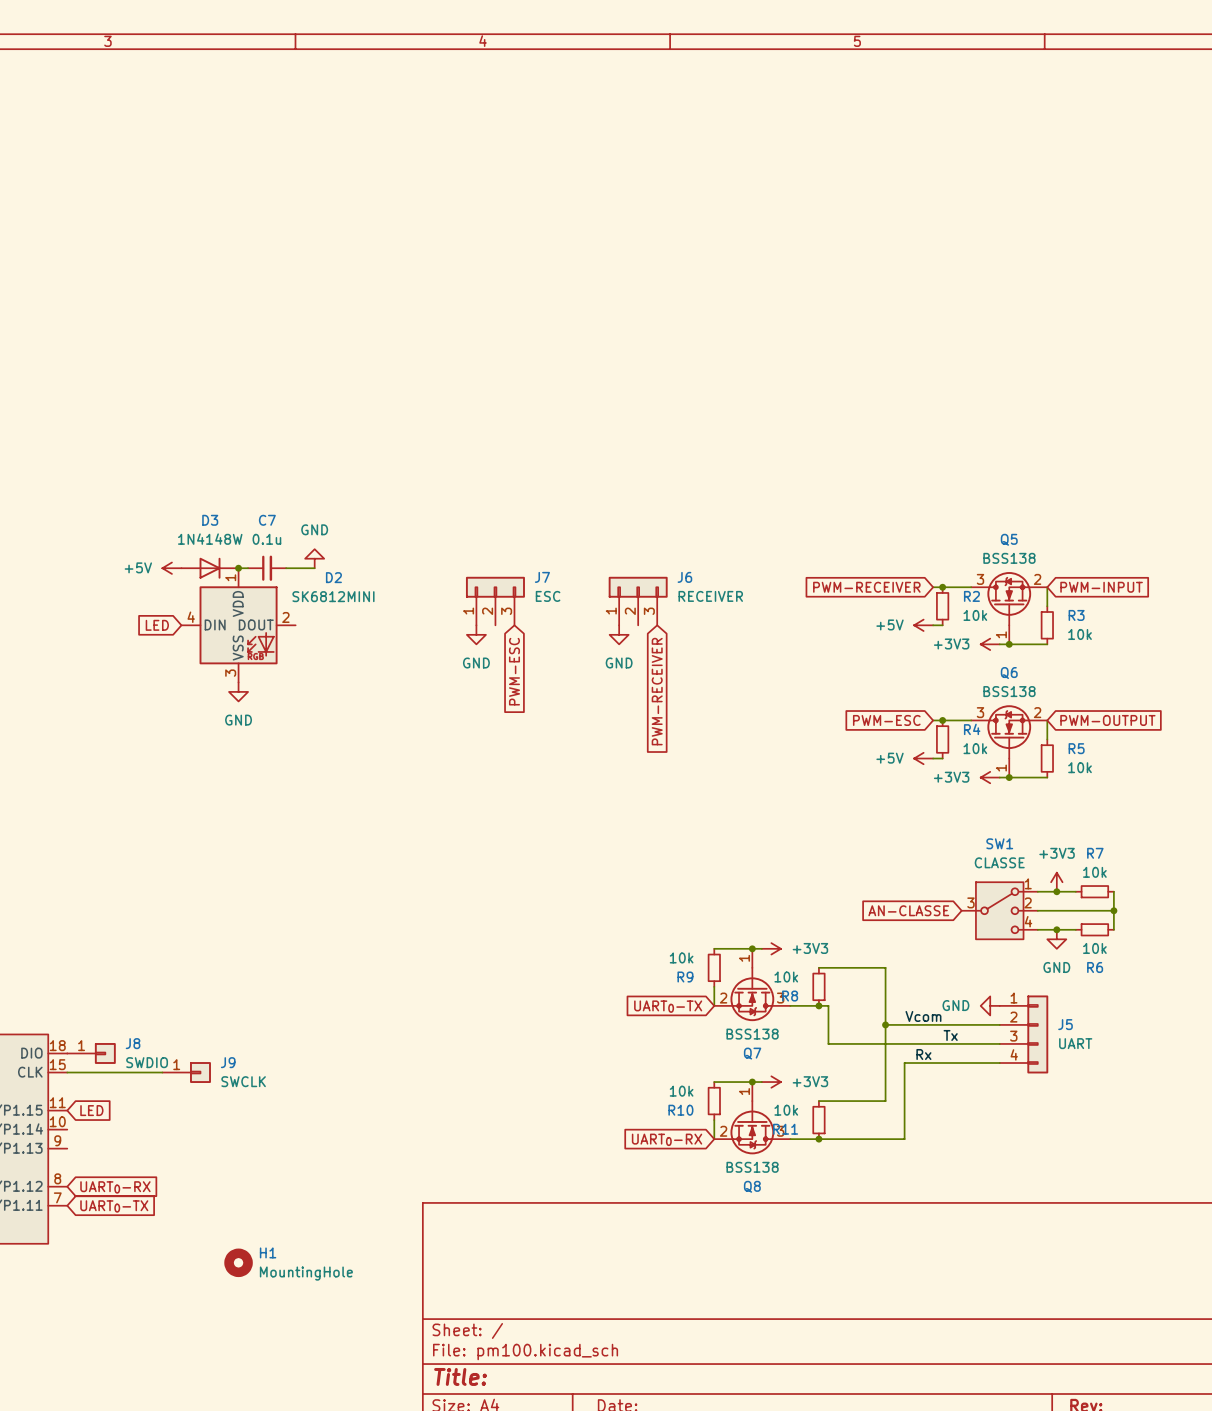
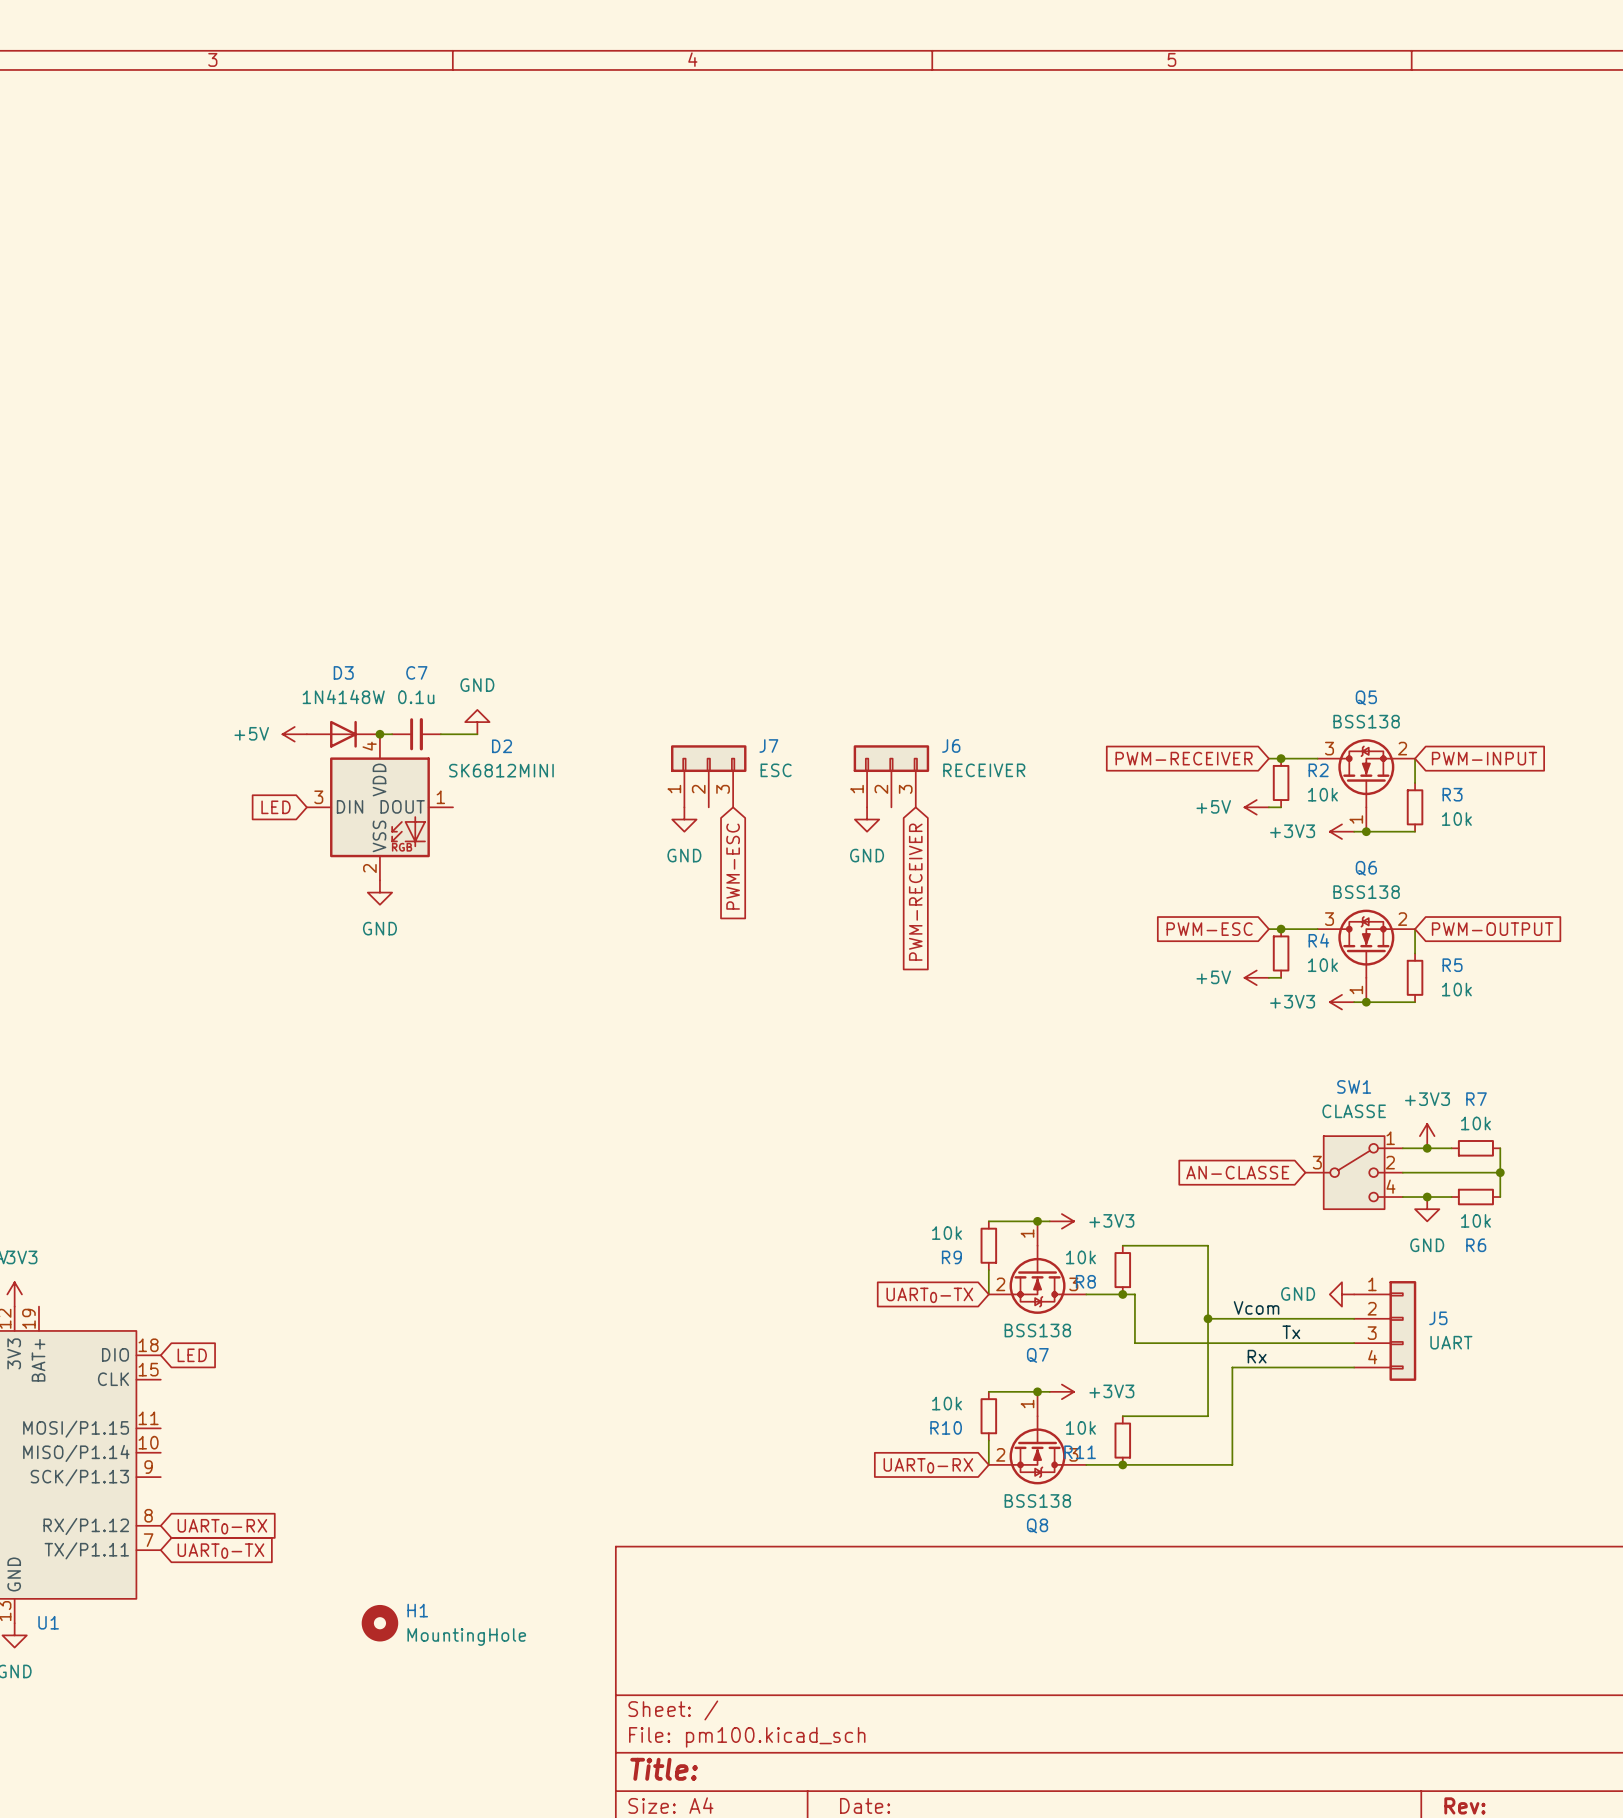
D2 pin number: 1 (230, 577) -> 4 (369, 746)
D2 pin number: 4 (191, 617) -> 3 (318, 797)
D2 pin number: 2 (285, 617) -> 1 (440, 797)
D2 pin number: 3 (230, 673) -> 2 (369, 868)
J8: SWDIO (91, 1053) -> none
wire: (67, 1072) (162, 1072) -> none
J9: SWCLK (186, 1072) -> none
global label position: LED (91, 1110) -> LED (192, 1355)

